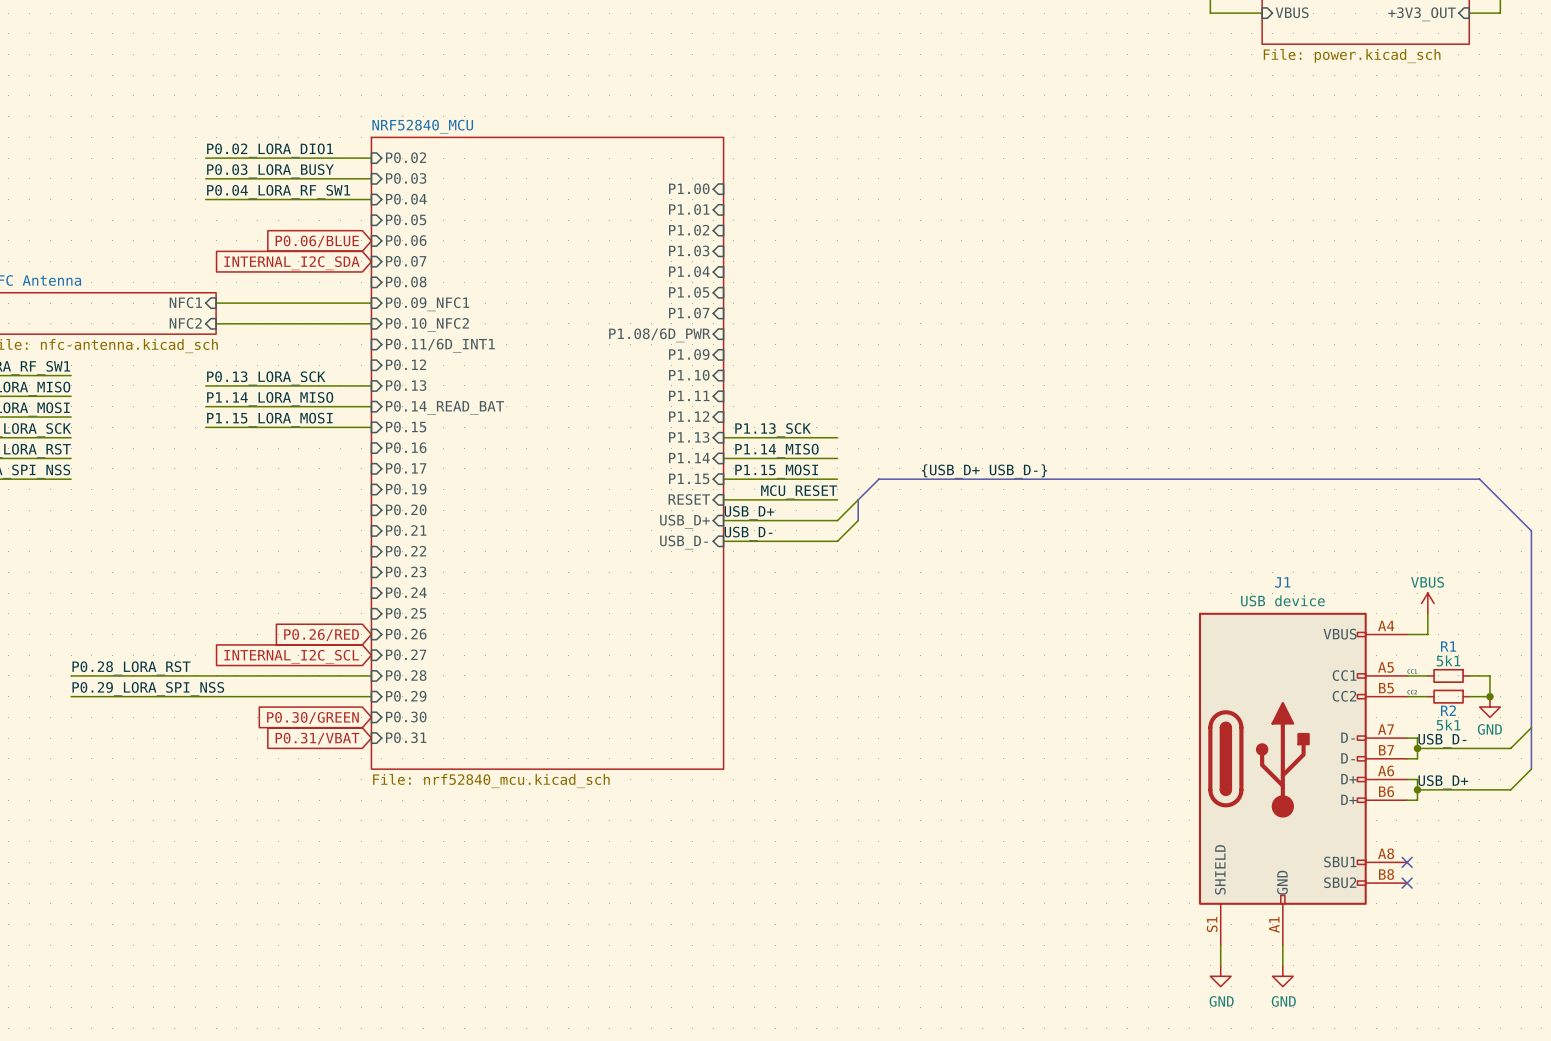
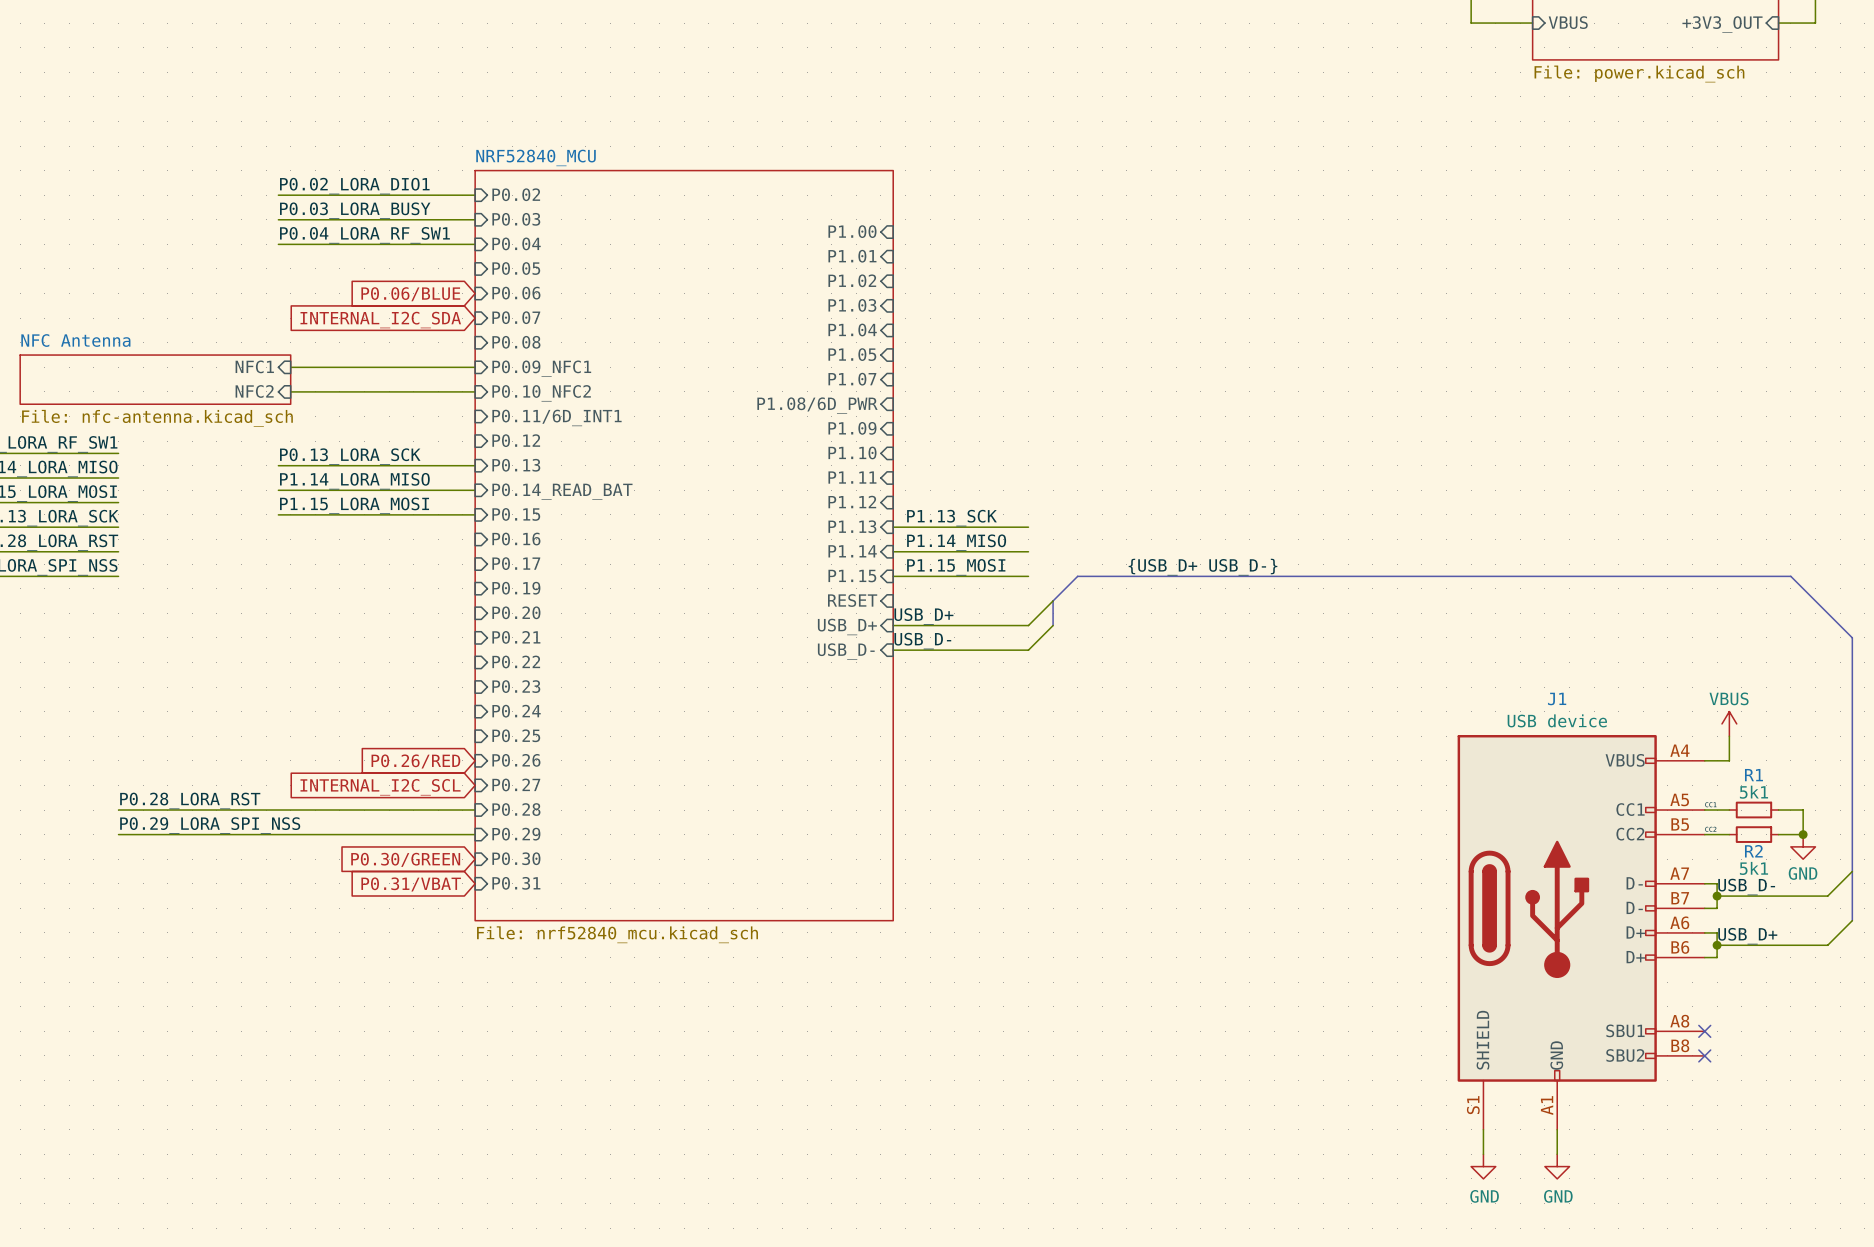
label: MCU_RESET (799, 492) -> none
wire: (723, 499) (837, 499) -> none

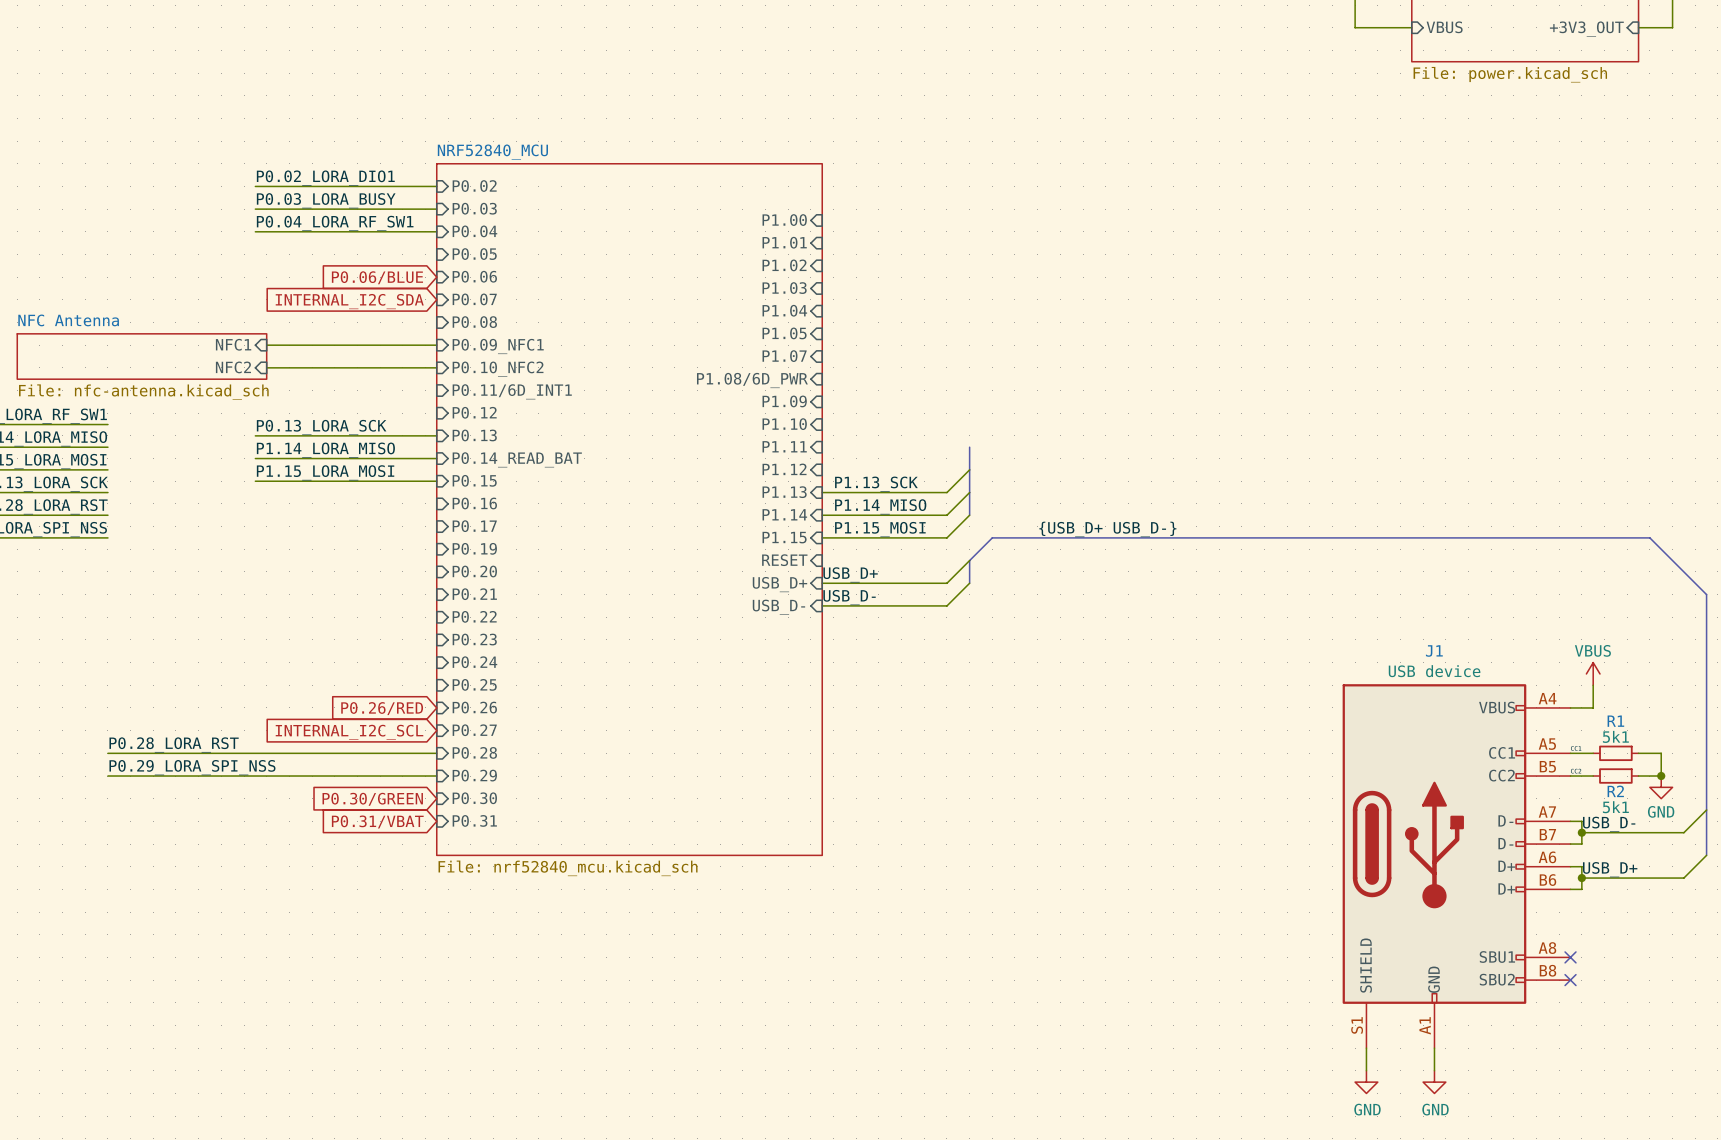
bus: none -> (969, 447) (969, 515)
wire: none -> (969, 469) (946, 492)
wire: none -> (969, 492) (946, 515)
wire: none -> (969, 515) (946, 537)

